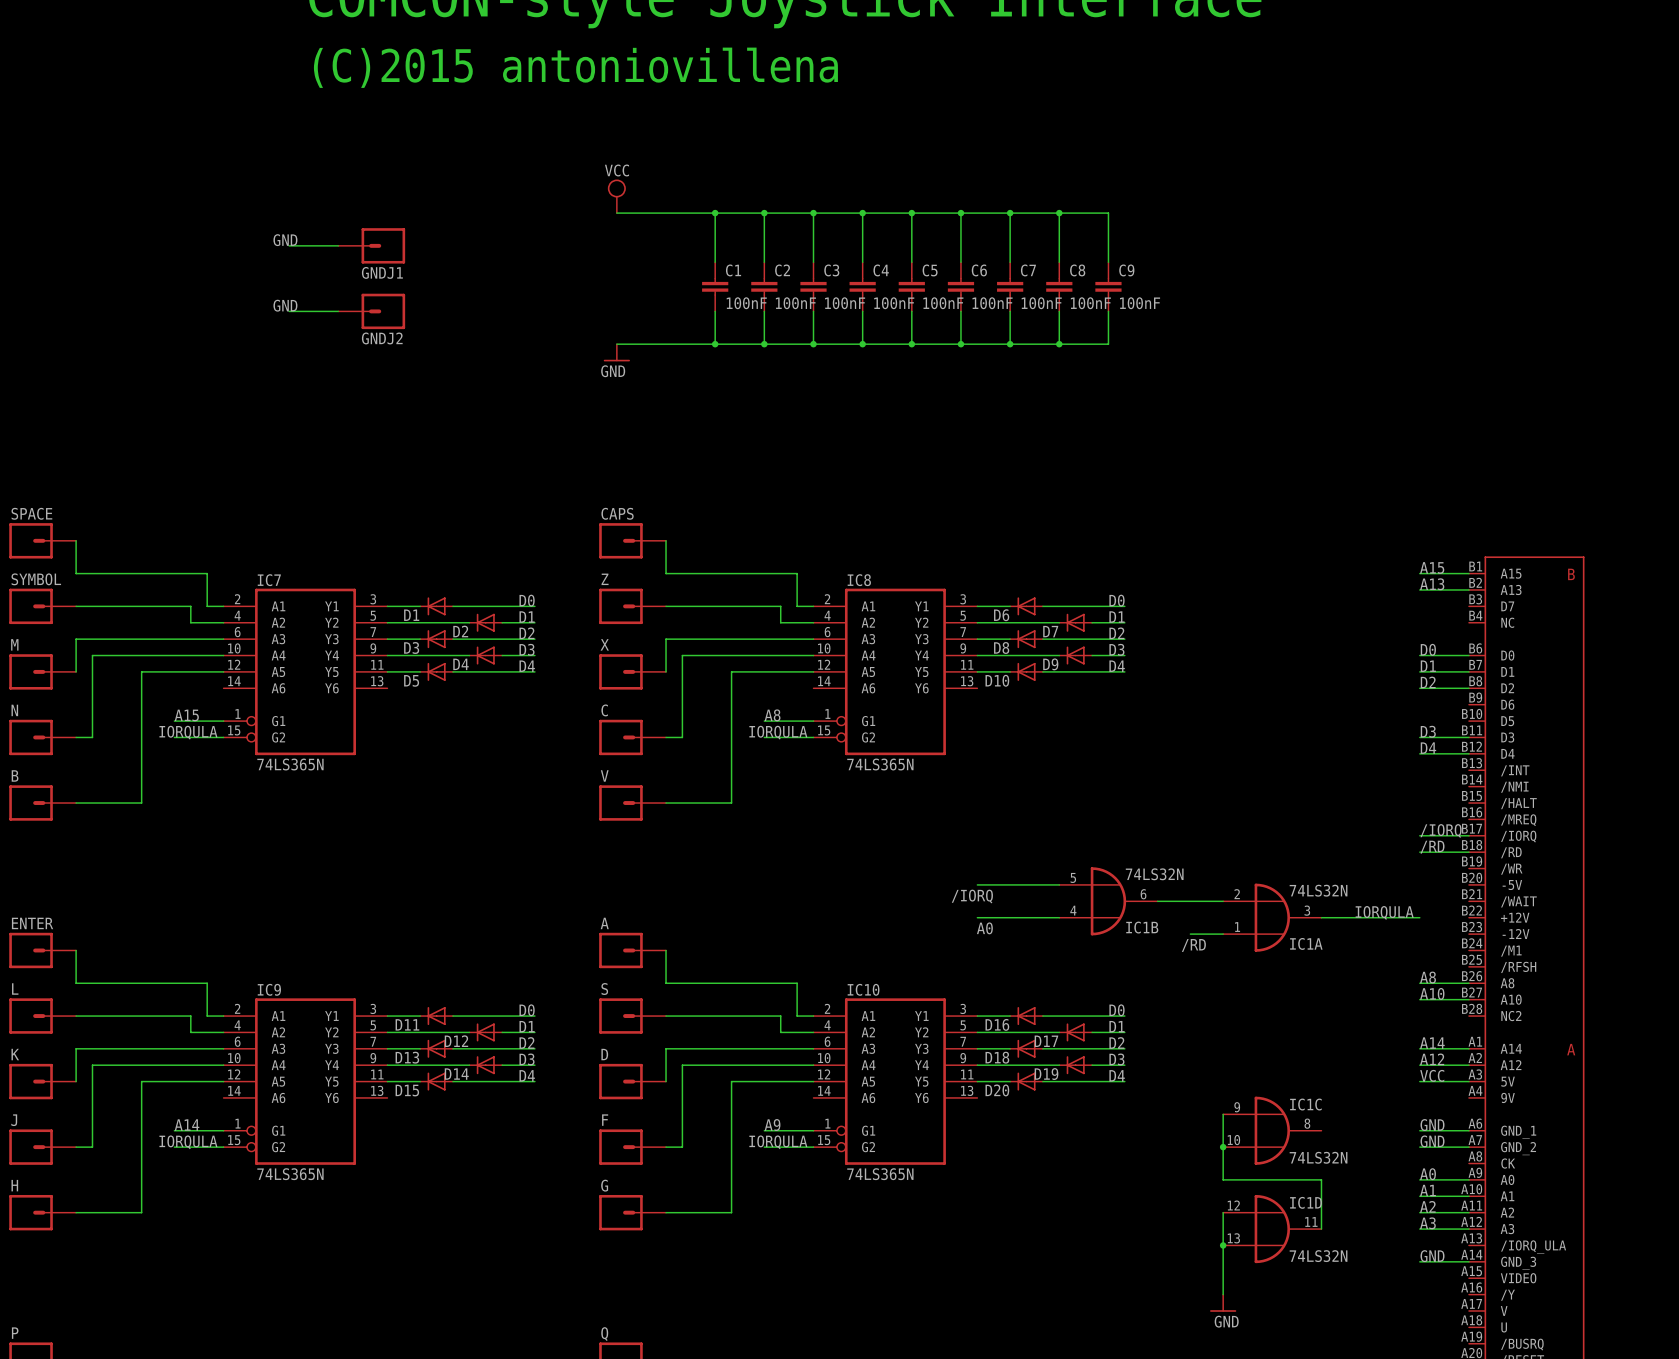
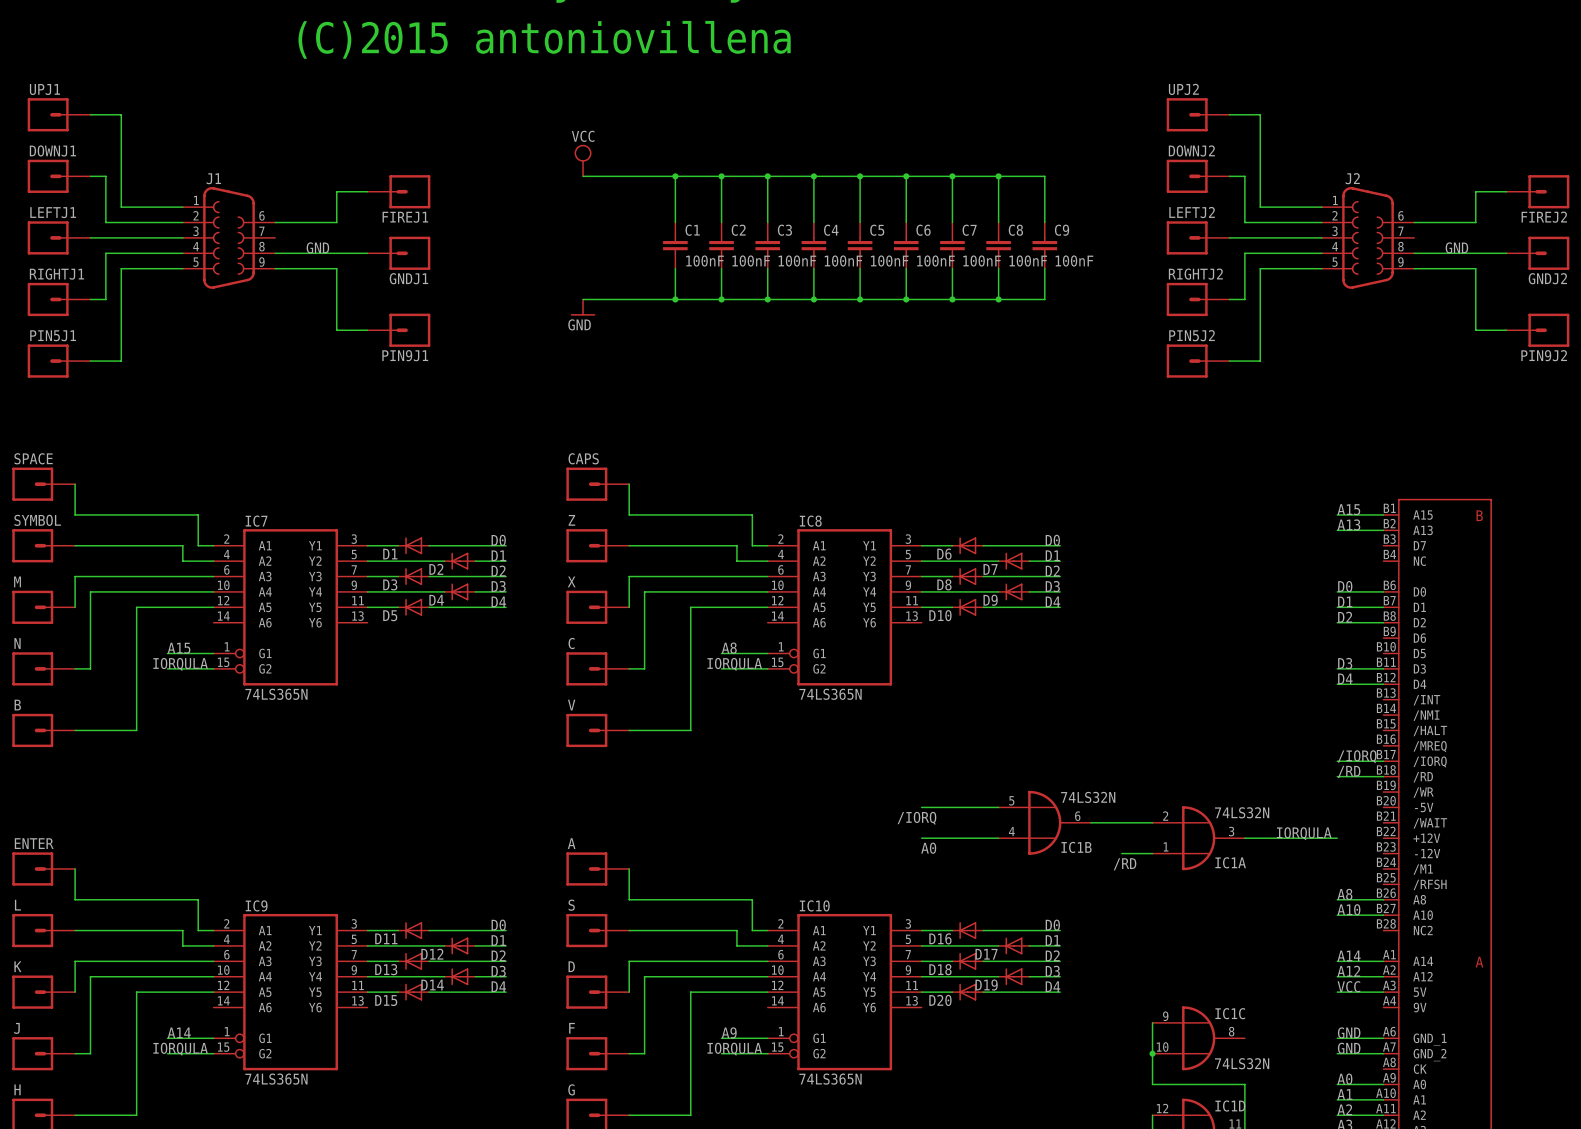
UPJ1: none -> (59, 114)
wire: none -> (90, 114) (121, 114) (121, 207) (182, 207)
UPJ2: none -> (1198, 114)
wire: none -> (1229, 114) (1260, 114) (1260, 207) (1321, 207)
DOWNJ1: none -> (59, 176)
wire: none -> (90, 176) (105, 176) (105, 222) (182, 222)
DOWNJ2: none -> (1198, 176)
wire: none -> (1229, 176) (1244, 176) (1244, 222) (1321, 222)
wire: none -> (367, 191) (336, 191) (336, 222) (275, 222)
FIREJ1: none -> (398, 191)
wire: none -> (1506, 191) (1475, 191) (1475, 222) (1414, 222)
FIREJ2: none -> (1537, 191)
label: GND (285, 240) -> none
wire: (289, 245) (338, 245) -> none
GNDJ1 position: (371, 245) -> (398, 253)
LEFTJ1: none -> (59, 237)
wire: none -> (90, 237) (182, 237)
J1: none -> (229, 237)
LEFTJ2: none -> (1198, 237)
wire: none -> (1229, 237) (1321, 237)
J2: none -> (1368, 237)
label: none -> GND (317, 247)
label: none -> GND (1456, 247)
wire: none -> (182, 253) (105, 253) (105, 299) (90, 299)
wire: none -> (275, 253) (367, 253)
wire: none -> (1321, 253) (1244, 253) (1244, 299) (1229, 299)
wire: none -> (1414, 253) (1506, 253)
label: GND (285, 305) -> none
wire: none -> (182, 268) (121, 268) (121, 361) (90, 361)
wire: none -> (321, 268) (336, 268) (336, 330) (367, 330)
GNDJ2 position: (371, 311) -> (1537, 253)
wire: none -> (1321, 268) (1260, 268) (1260, 361) (1229, 361)
wire: none -> (1414, 268) (1475, 268) (1475, 330) (1506, 330)
RIGHTJ1: none -> (59, 299)
RIGHTJ2: none -> (1198, 299)
PIN9J1: none -> (398, 330)
PIN9J2: none -> (1537, 330)
PIN5J1: none -> (59, 361)
PIN5J2: none -> (1198, 361)

